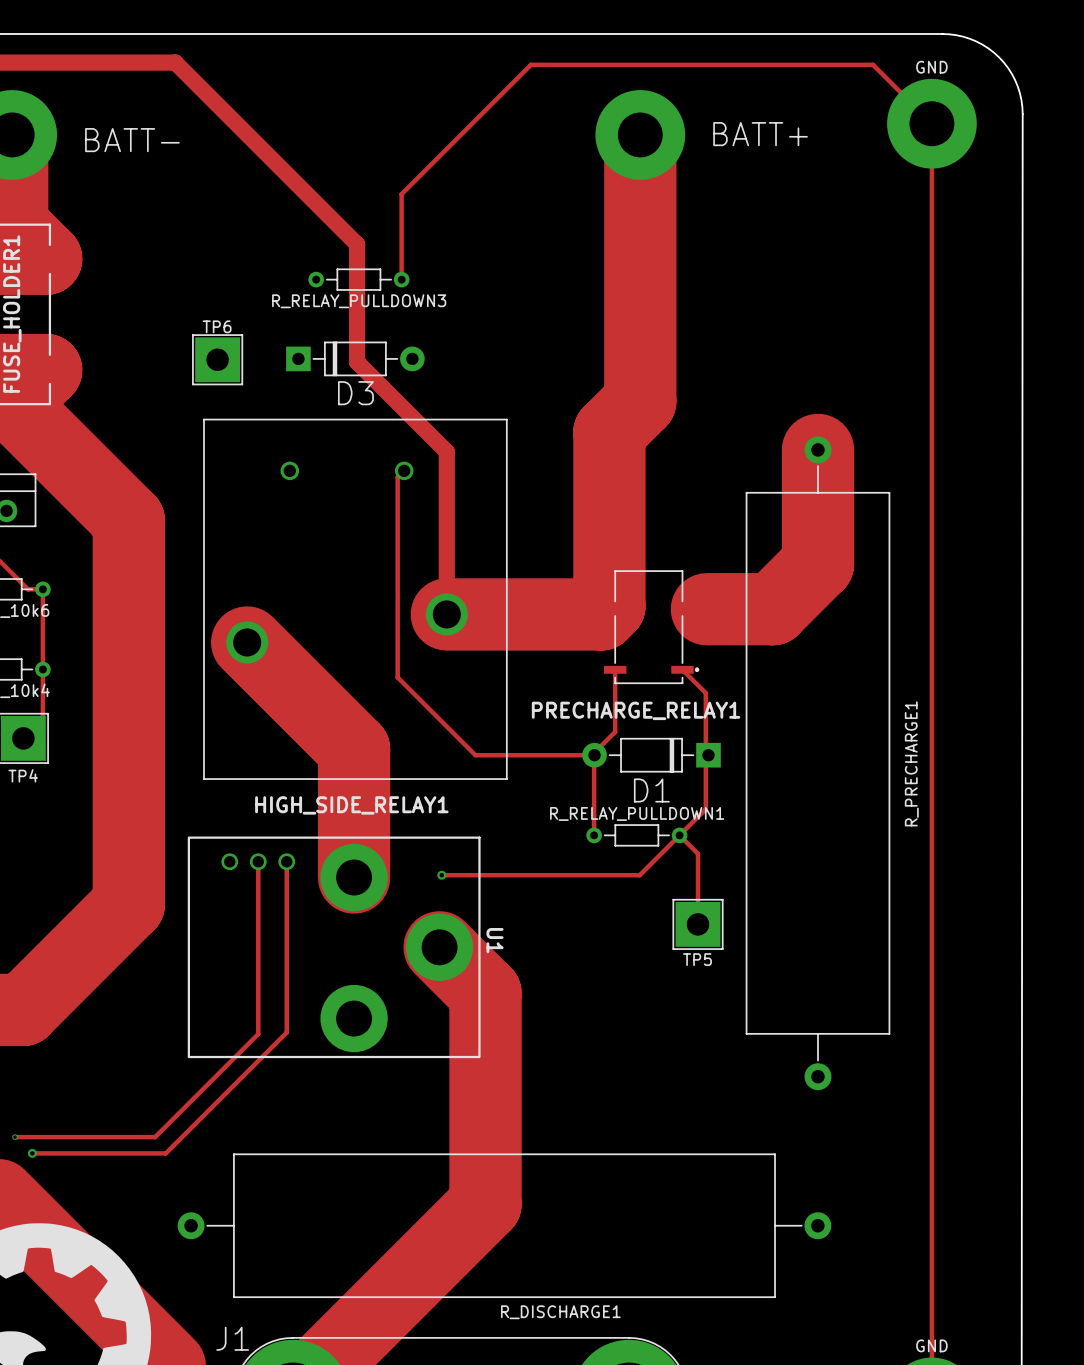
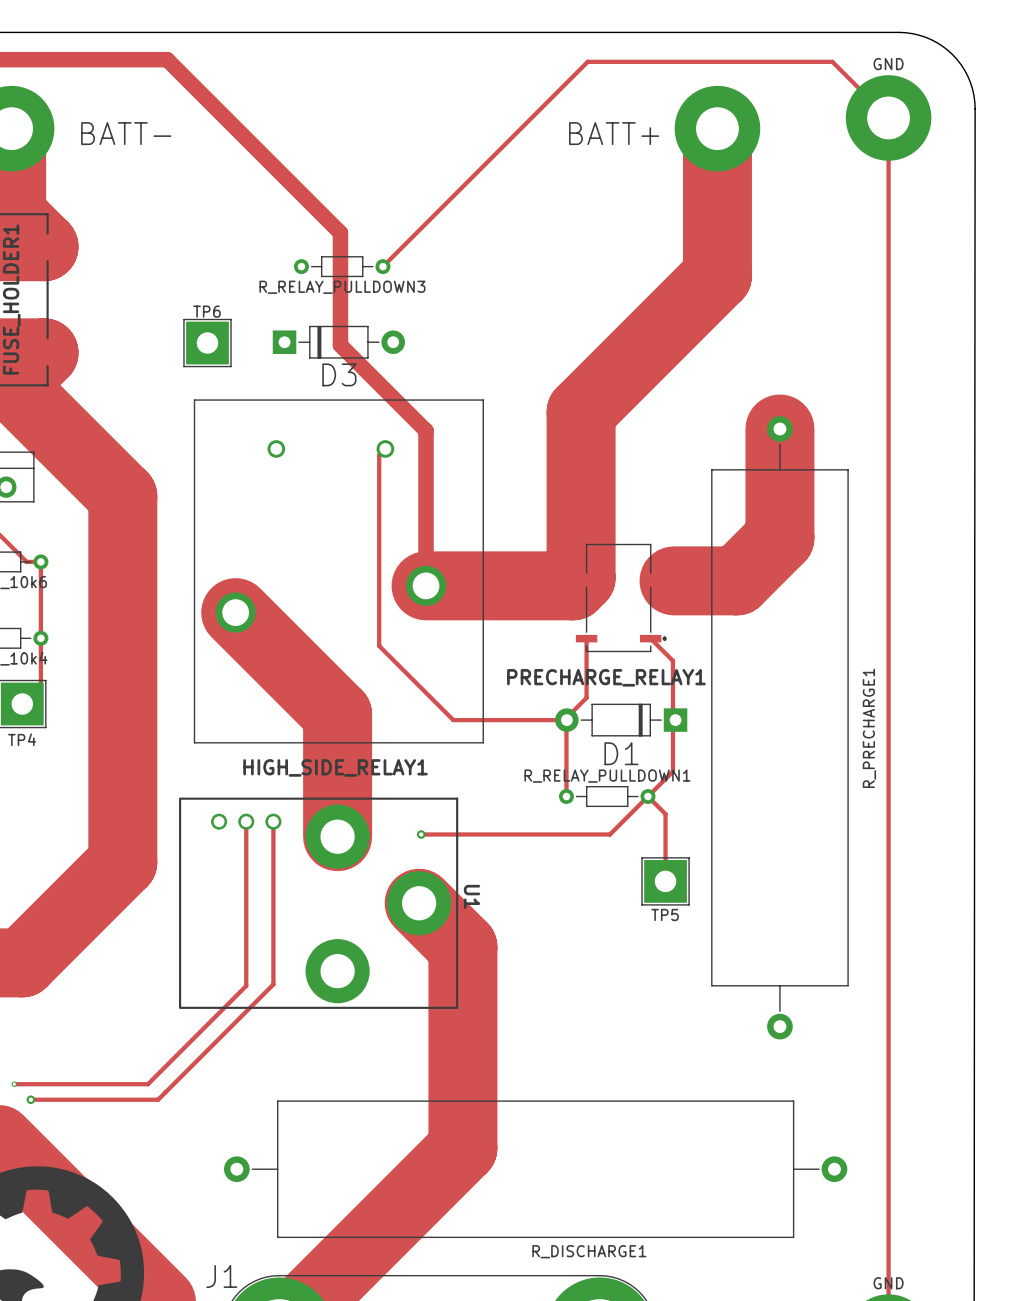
track: (616, 64) (530, 64) (401, 194) (401, 279) -> (587, 61) (382, 266)
track: (640, 134) (640, 401) -> (717, 128) (717, 275) (610, 382)
part position: (640, 134) -> (717, 128)
text position: BATT+ (760, 134) -> BATT+ (614, 133)
R_DISCHARGE1 position: (504, 1225) -> (535, 1169)

